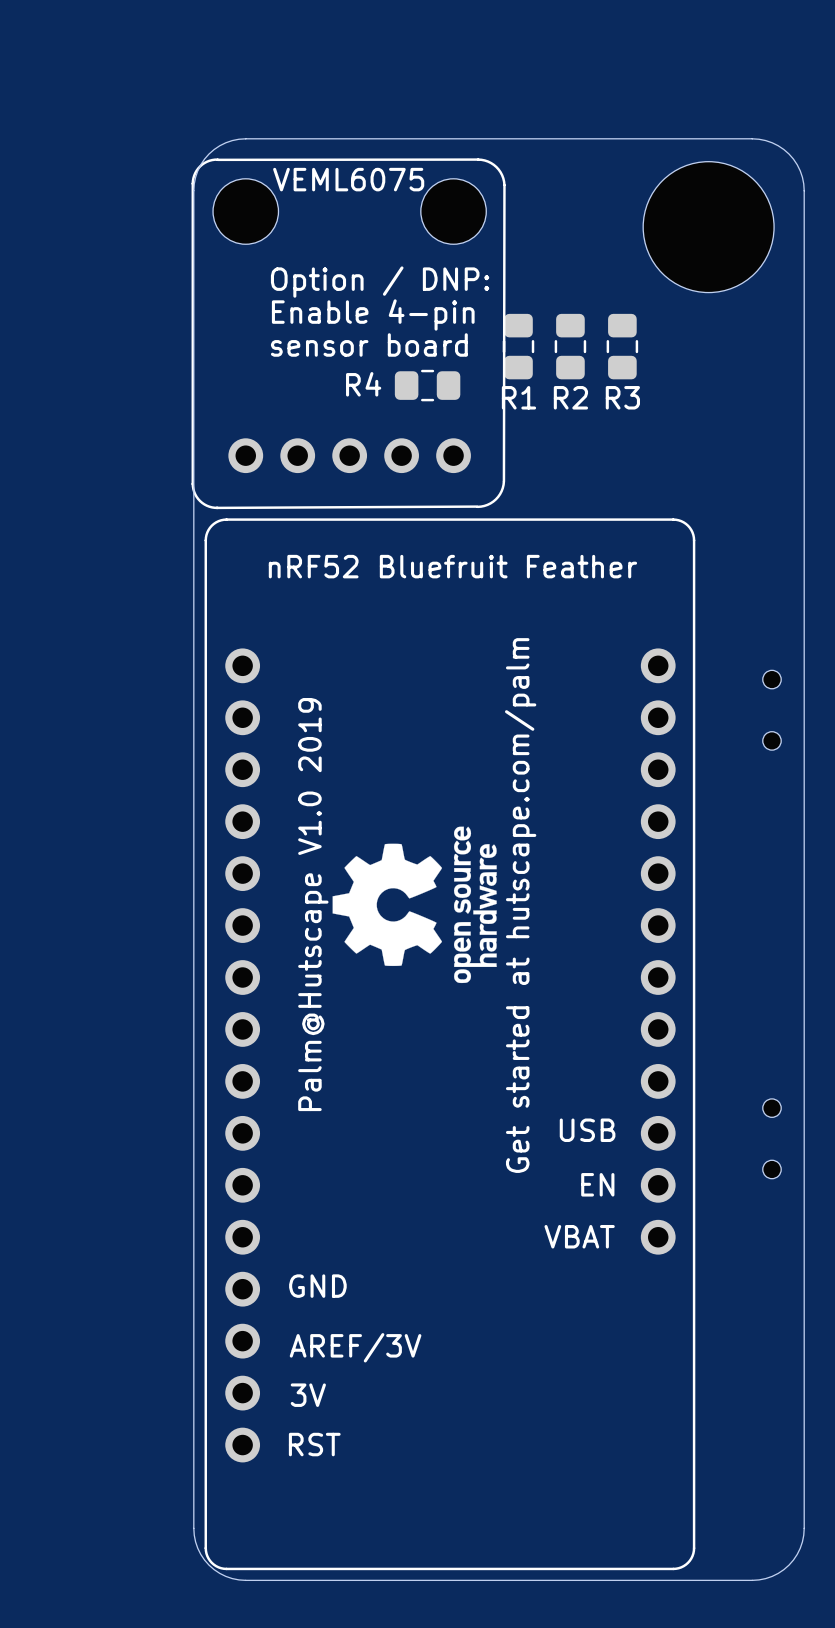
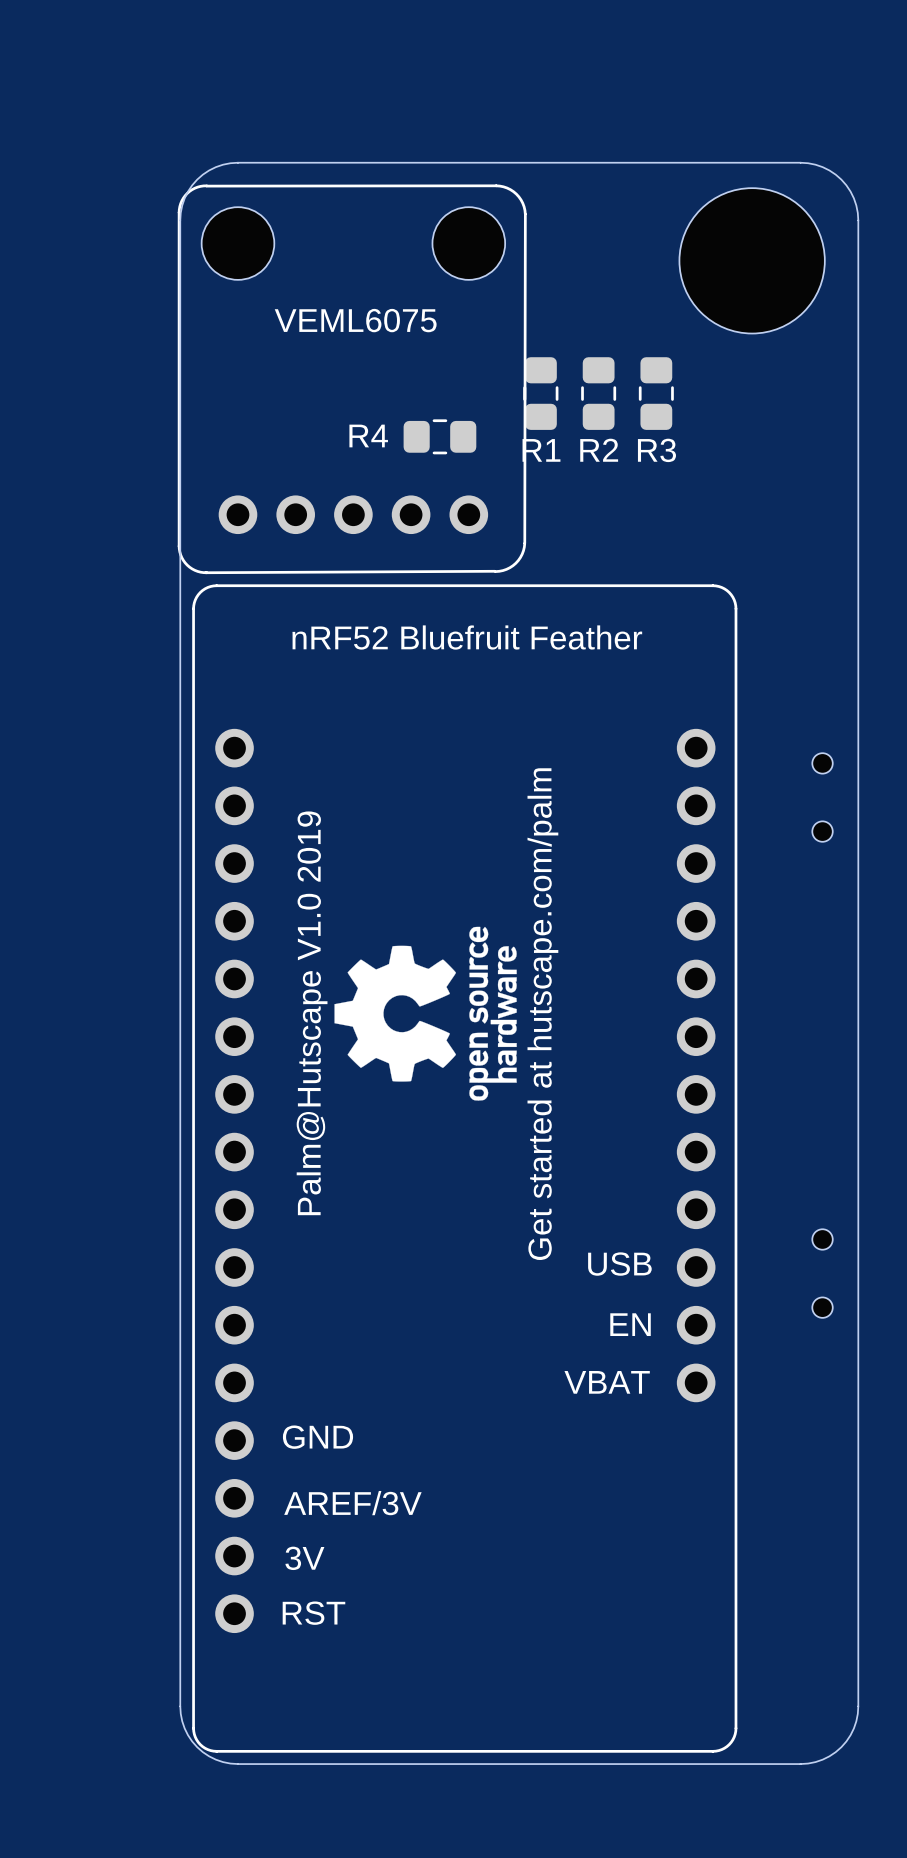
part text position: VEML6075 (348, 179) -> VEML6075 (355, 320)
text: Option / DNP: (380, 282) -> none
text: Enable 4-pin (373, 314) -> none
text: sensor board (369, 344) -> none

